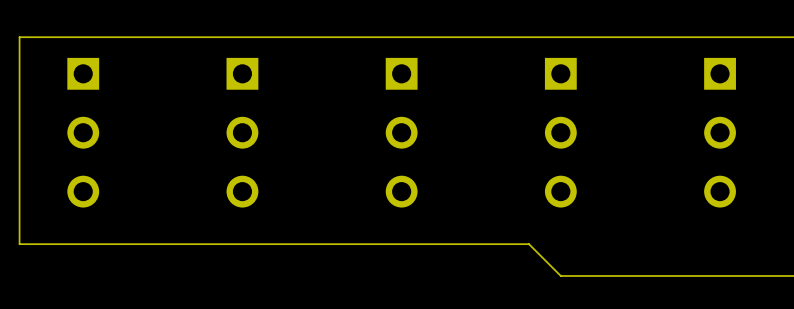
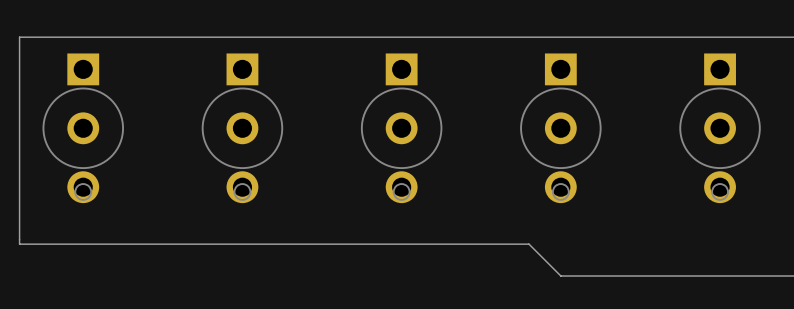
part footprint: [67, 57, 100, 208] -> [42, 53, 124, 204]
part footprint: [226, 57, 259, 208] -> [201, 53, 284, 204]
part footprint: [385, 57, 418, 208] -> [360, 53, 443, 204]
part footprint: [544, 57, 577, 208] -> [520, 53, 602, 204]
part footprint: [704, 57, 736, 208] -> [679, 53, 761, 204]

